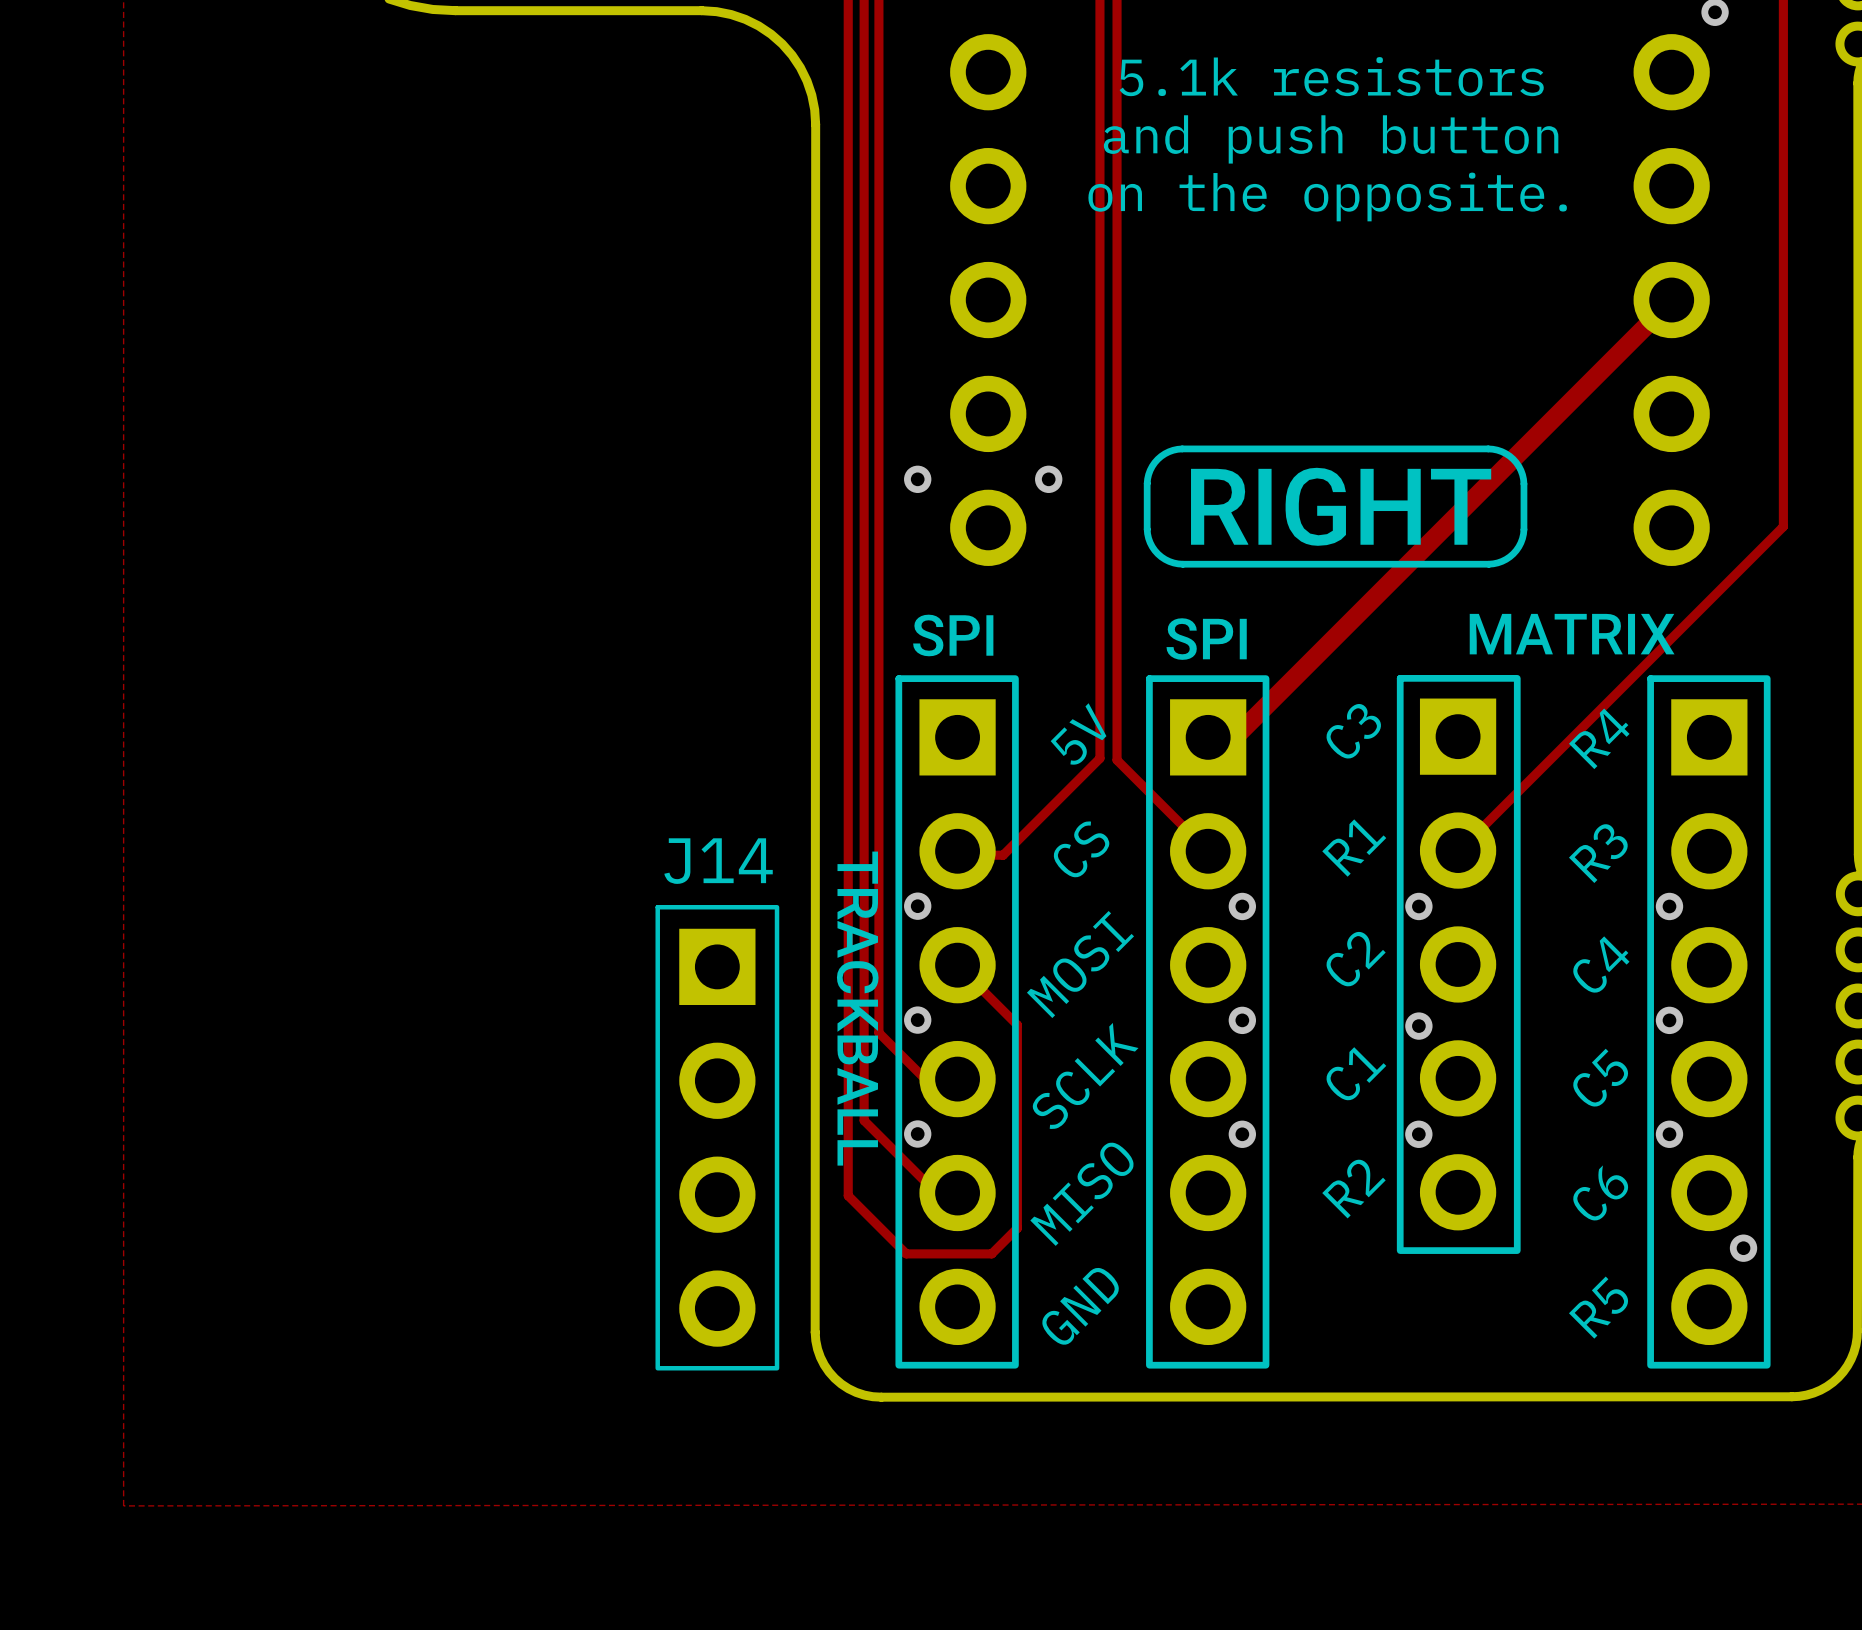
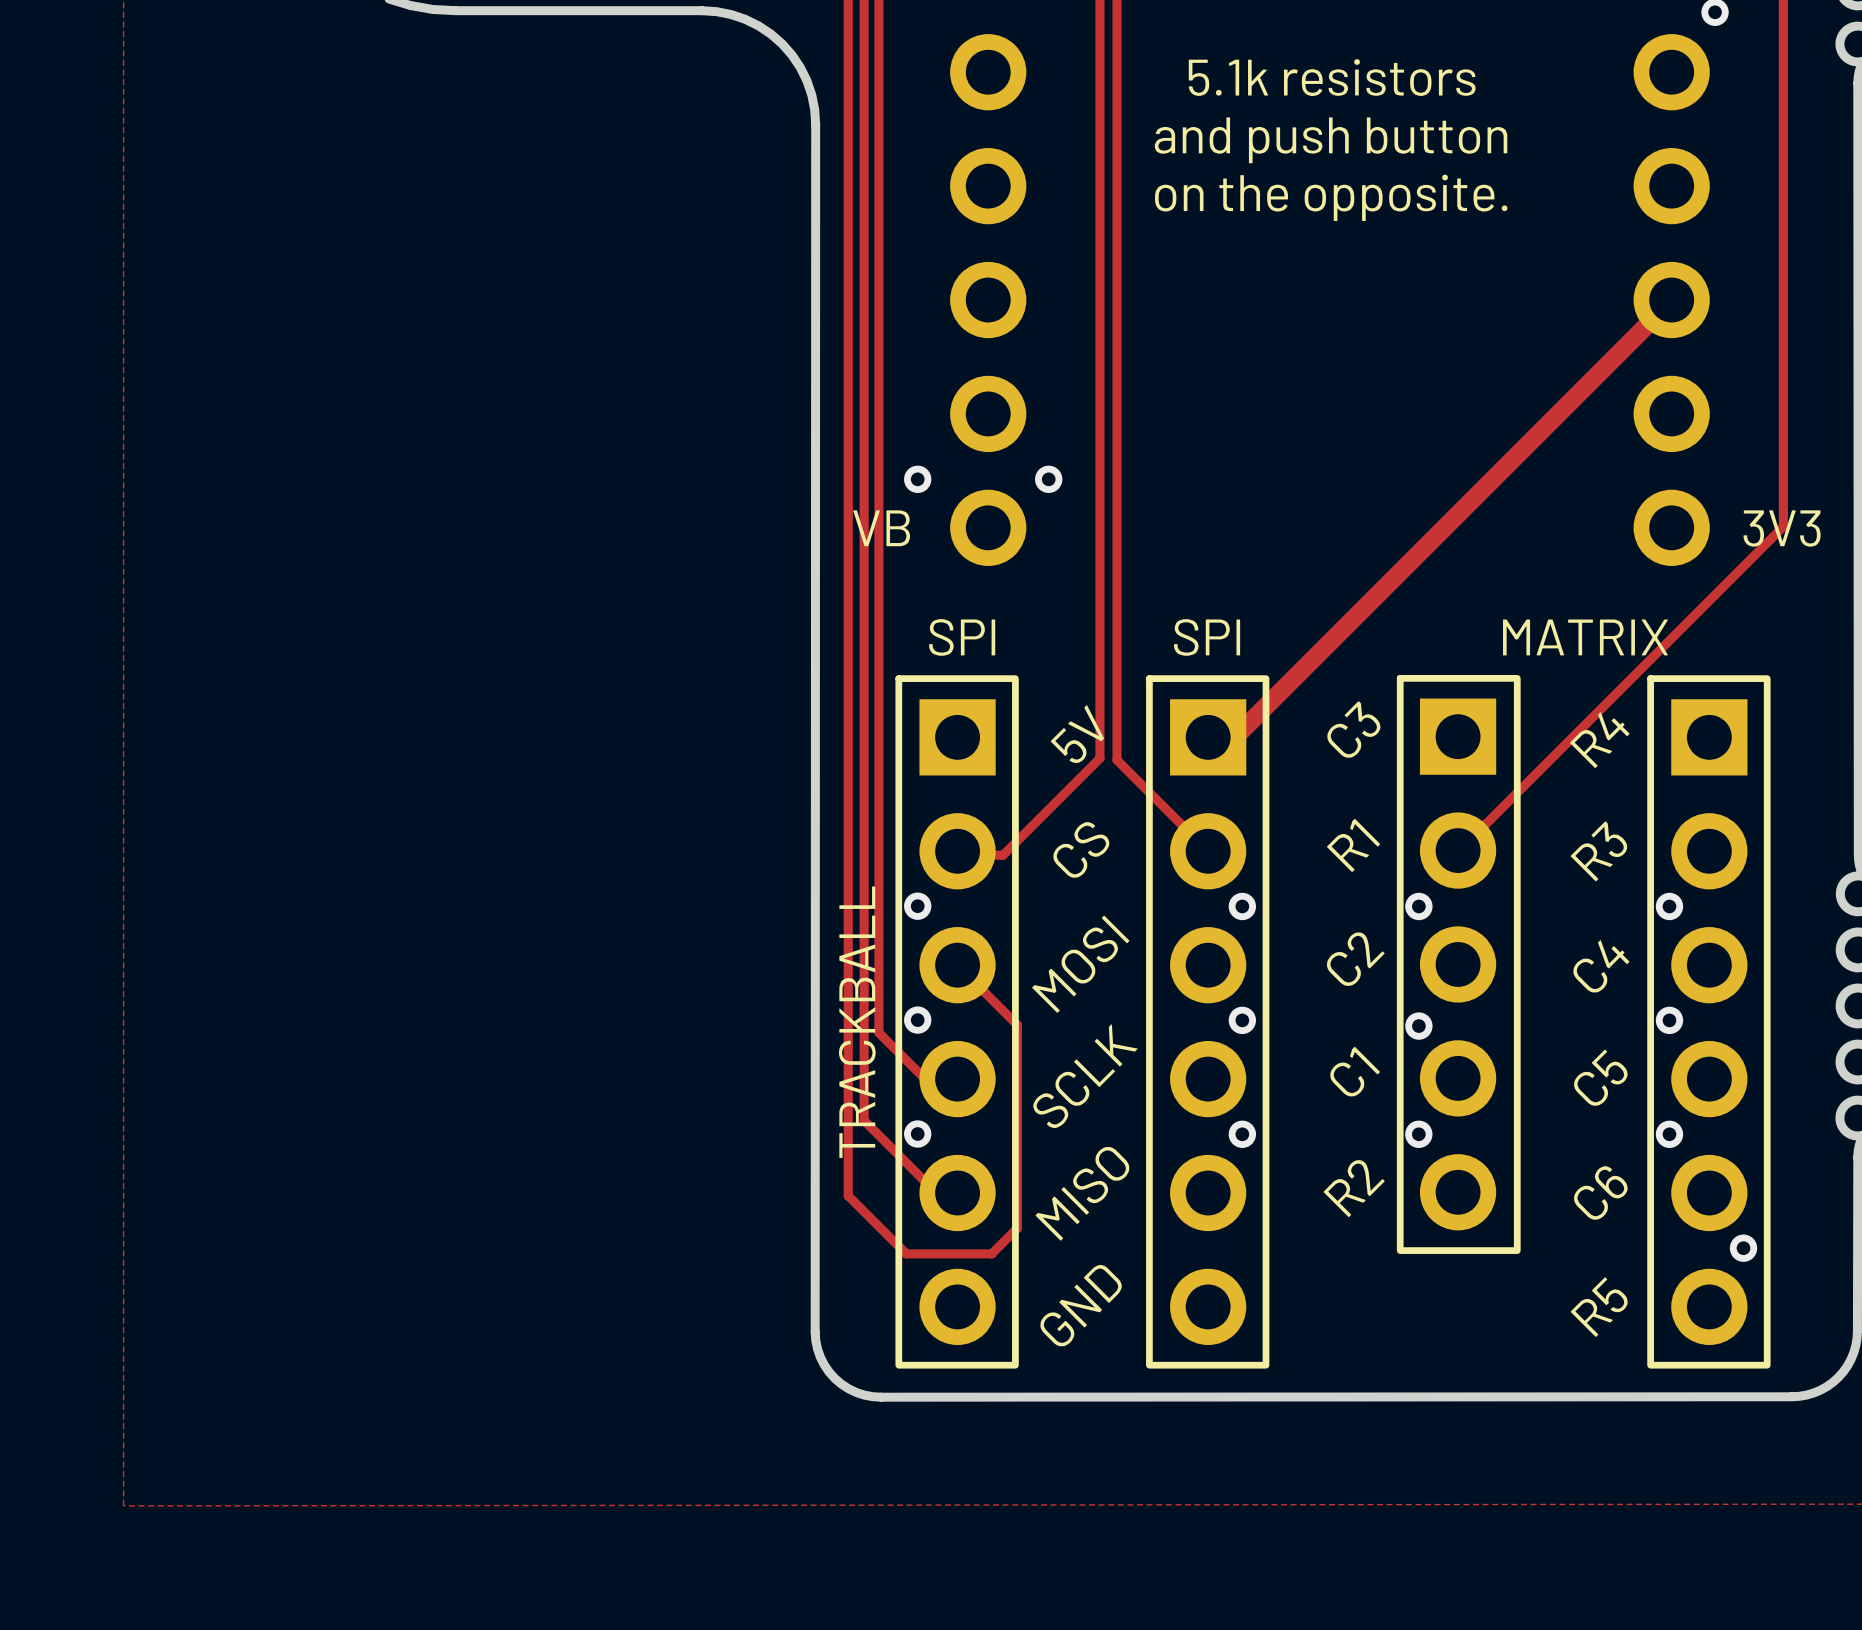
line: (1182, 448) (1497, 450) (1513, 459) (1522, 474) (1522, 538) (1518, 546) (1509, 556) (1497, 562) (1488, 564) (1173, 562) (1157, 553) (1148, 538) (1147, 483) (1150, 470) (1157, 459) (1169, 451) (1182, 448) -> none
drawing: [1191, 467, 1492, 546] -> none
text: none -> VB (881, 528)
text: none -> 3V3 (1782, 528)
drawing: [1469, 613, 1675, 655] -> none
drawing: [913, 614, 994, 657] -> none
drawing: [1166, 618, 1247, 660] -> none
text: none -> SPI (962, 637)
text: none -> SPI (1207, 637)
text: none -> MATRIX (1585, 637)
drawing: [836, 851, 879, 1166] -> none
text: none -> TRACKBALL (857, 1022)
J14: (717, 1137) -> none

